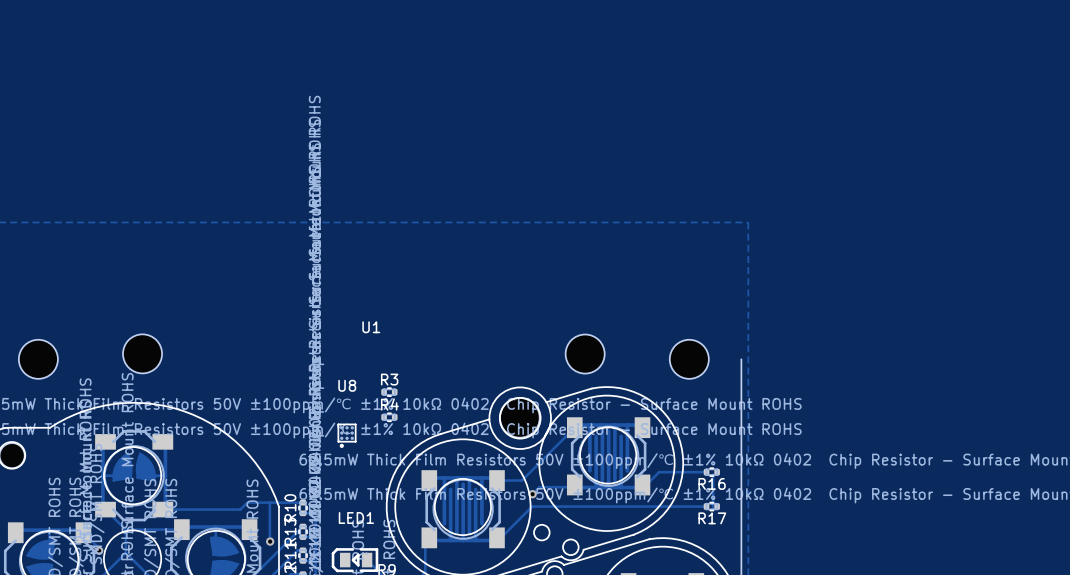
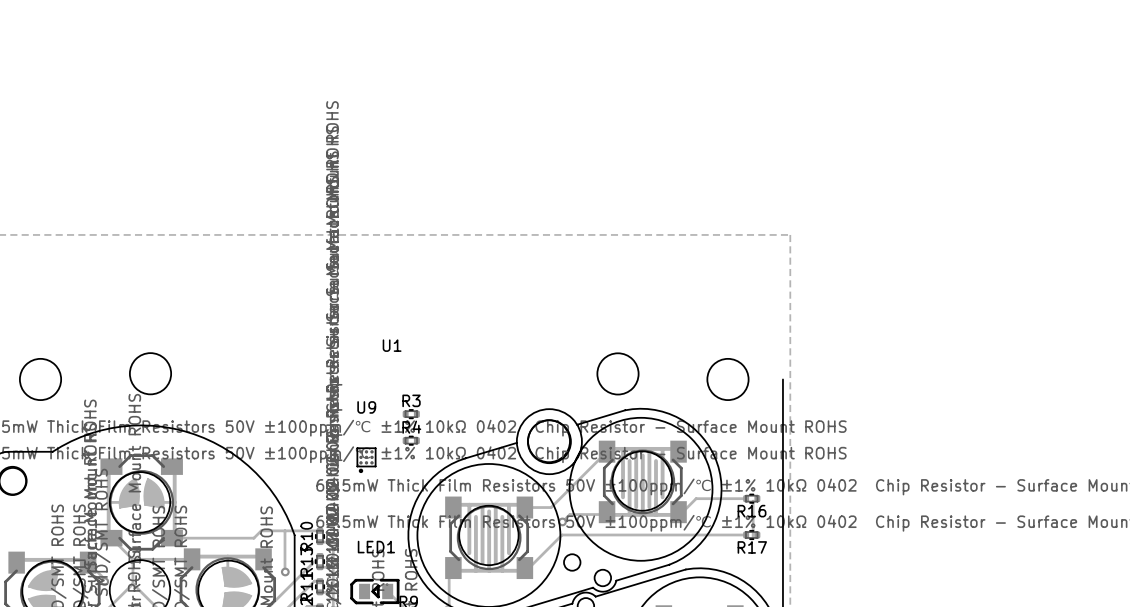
U8 name: U8 (347, 385) -> U9 (366, 407)

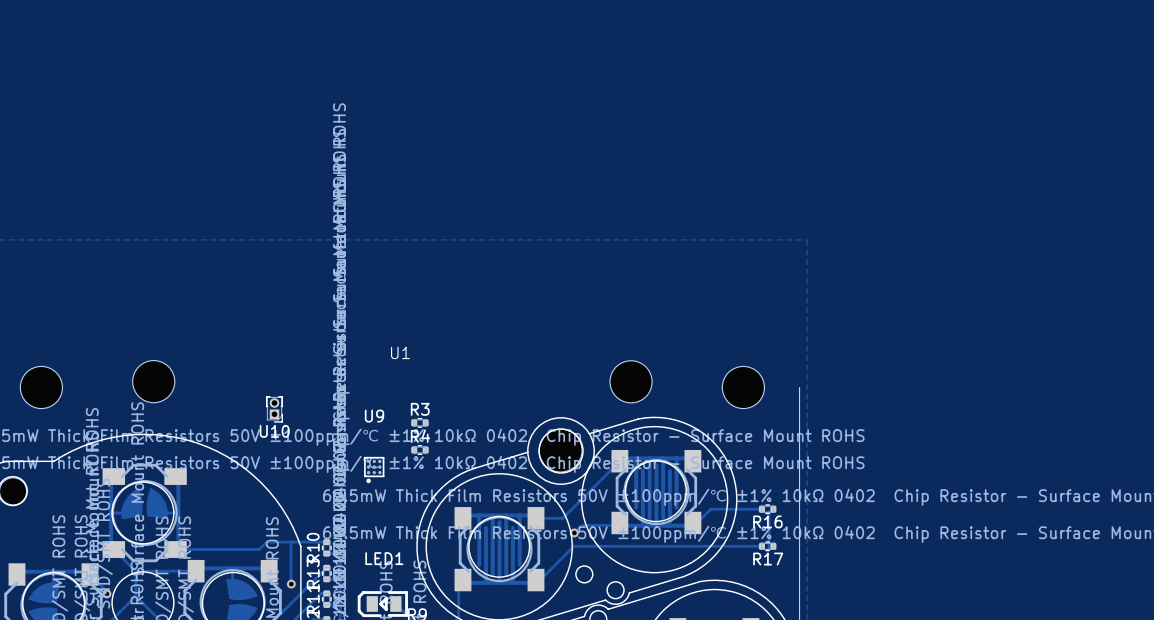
U10: none -> (274, 409)

